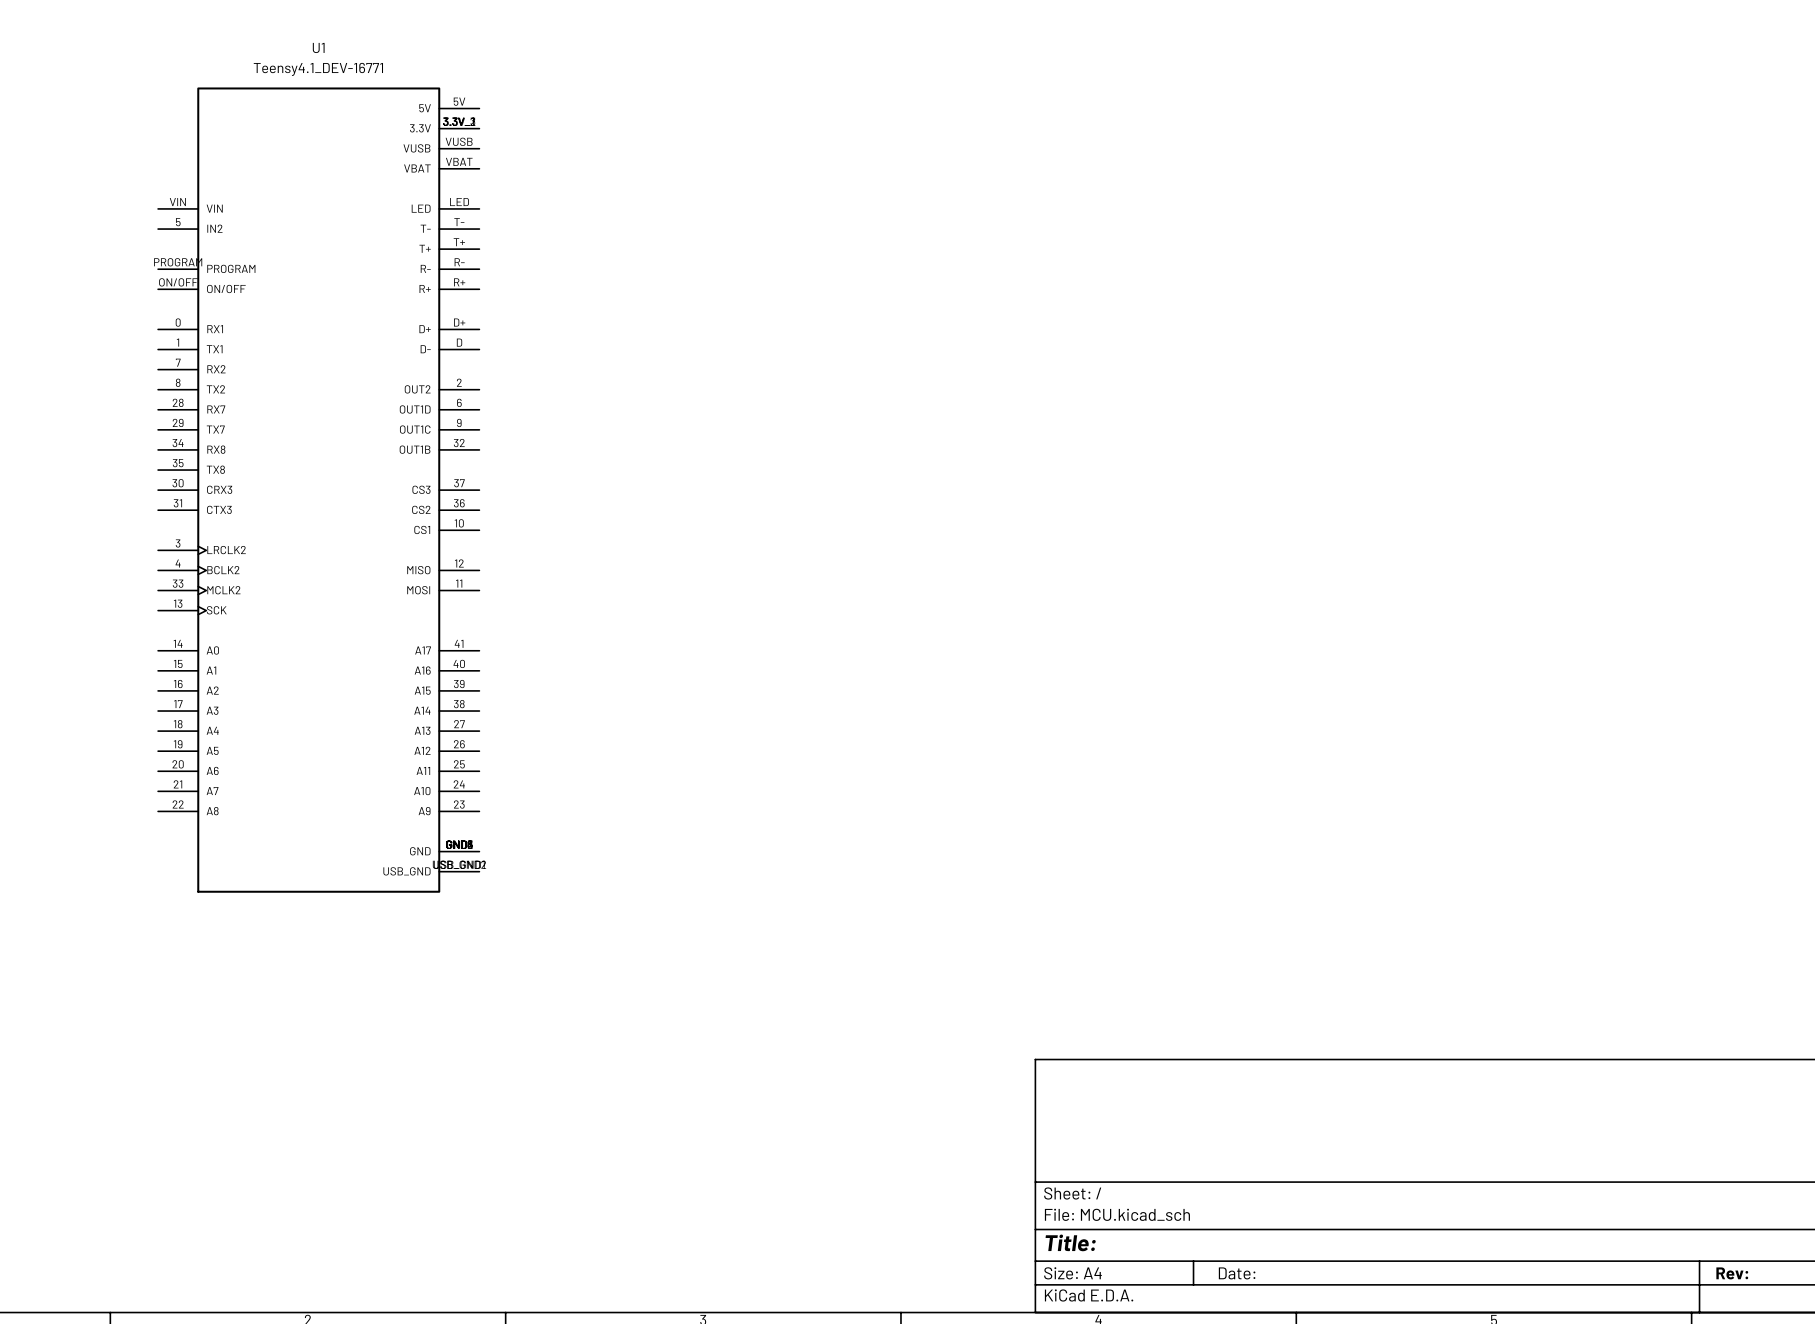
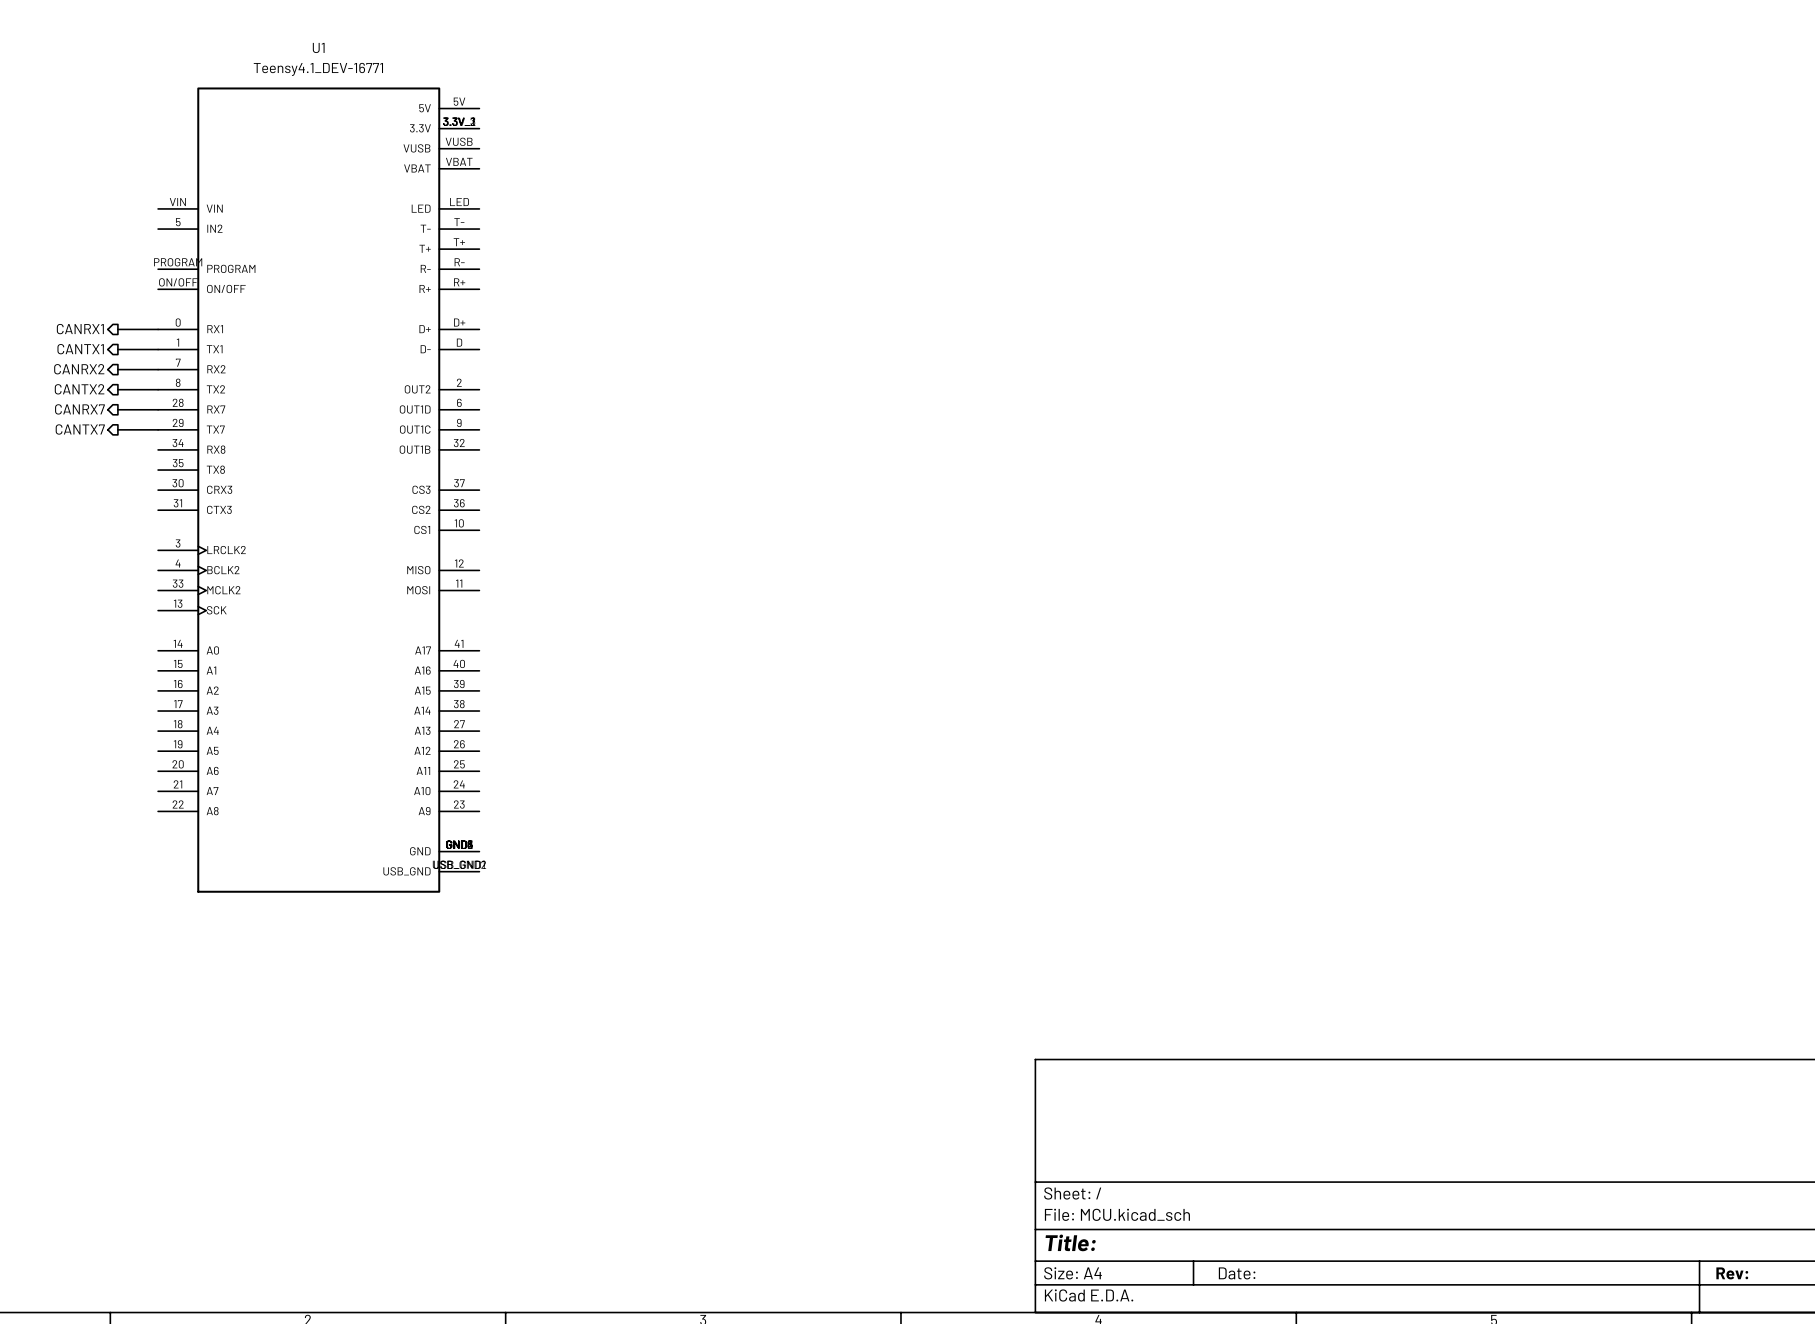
hierarchical label: none -> CANRX1 (80, 329)
wire: none -> (117, 329) (158, 329)
hierarchical label: none -> CANTX1 (80, 349)
wire: none -> (117, 349) (158, 349)
hierarchical label: none -> CANRX2 (79, 369)
wire: none -> (117, 369) (158, 369)
hierarchical label: none -> CANTX2 (79, 389)
wire: none -> (117, 389) (158, 389)
hierarchical label: none -> CANRX7 (79, 409)
wire: none -> (117, 409) (158, 409)
hierarchical label: none -> CANTX7 (80, 429)
wire: none -> (117, 429) (158, 429)

